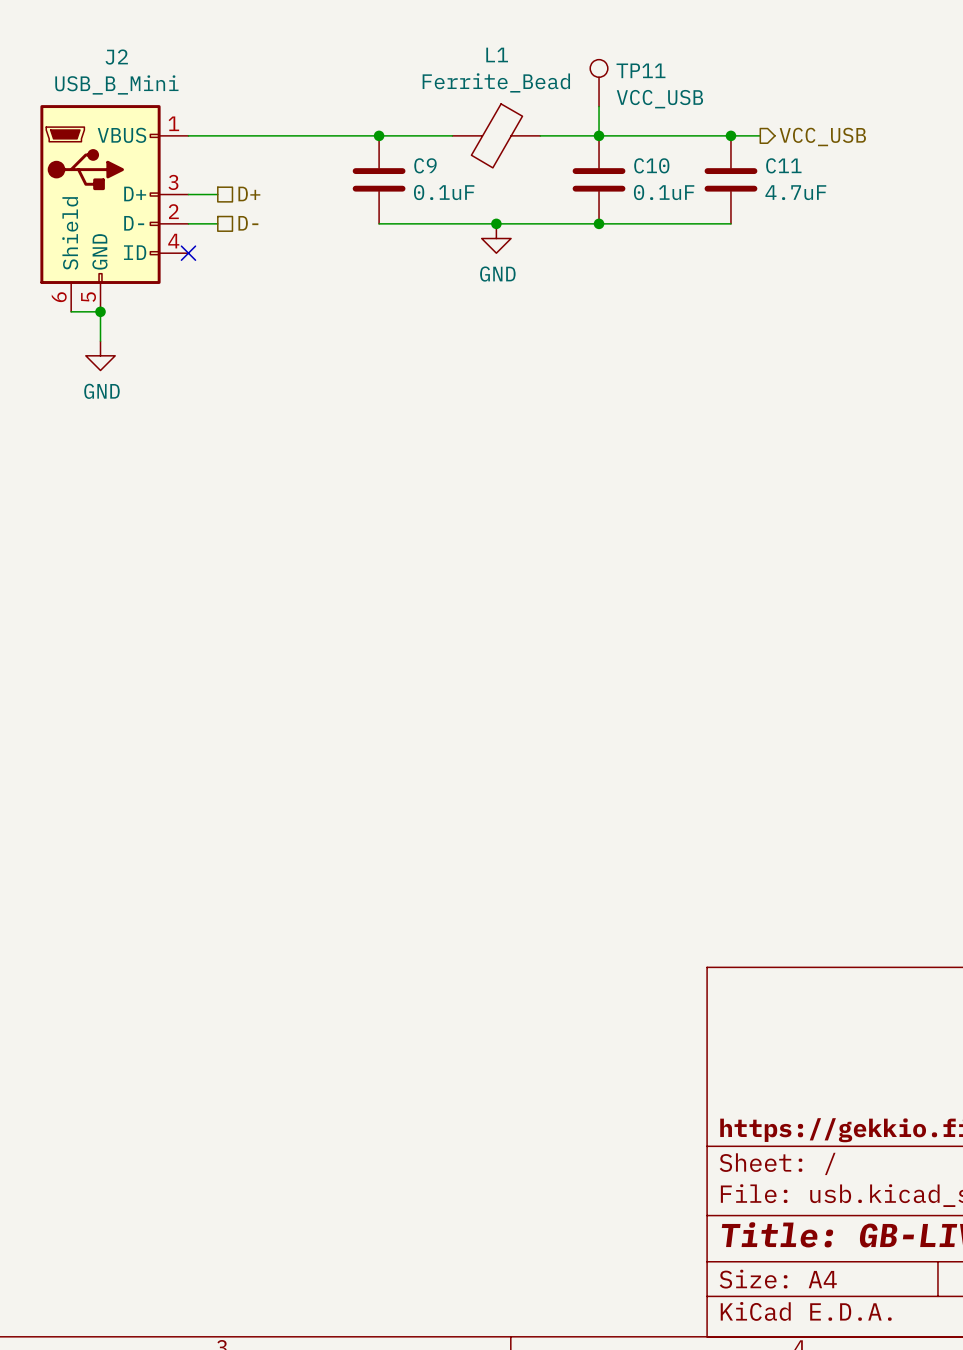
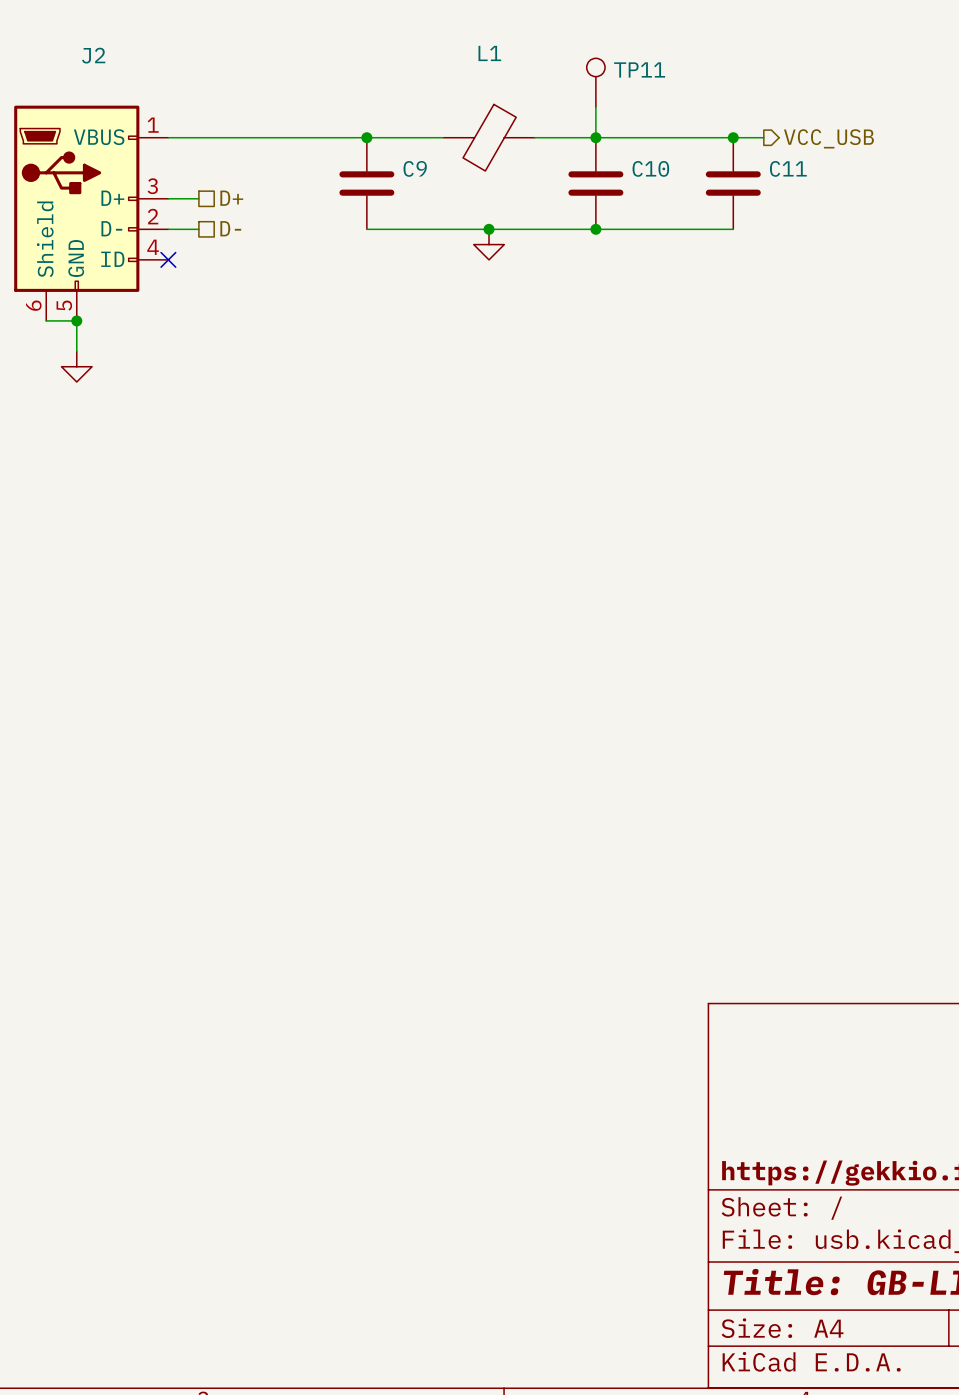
L1 value: Ferrite_Bead (496, 82) -> none
J2 value: USB_B_Mini (116, 84) -> none
TP11 value: VCC_USB (659, 99) -> none
C9 value: 0.1uF (444, 192) -> none
C10 value: 0.1uF (664, 192) -> none
C11 value: 4.7uF (795, 192) -> none
power symbol text: GND (497, 274) -> none
power symbol text: GND (101, 391) -> none

